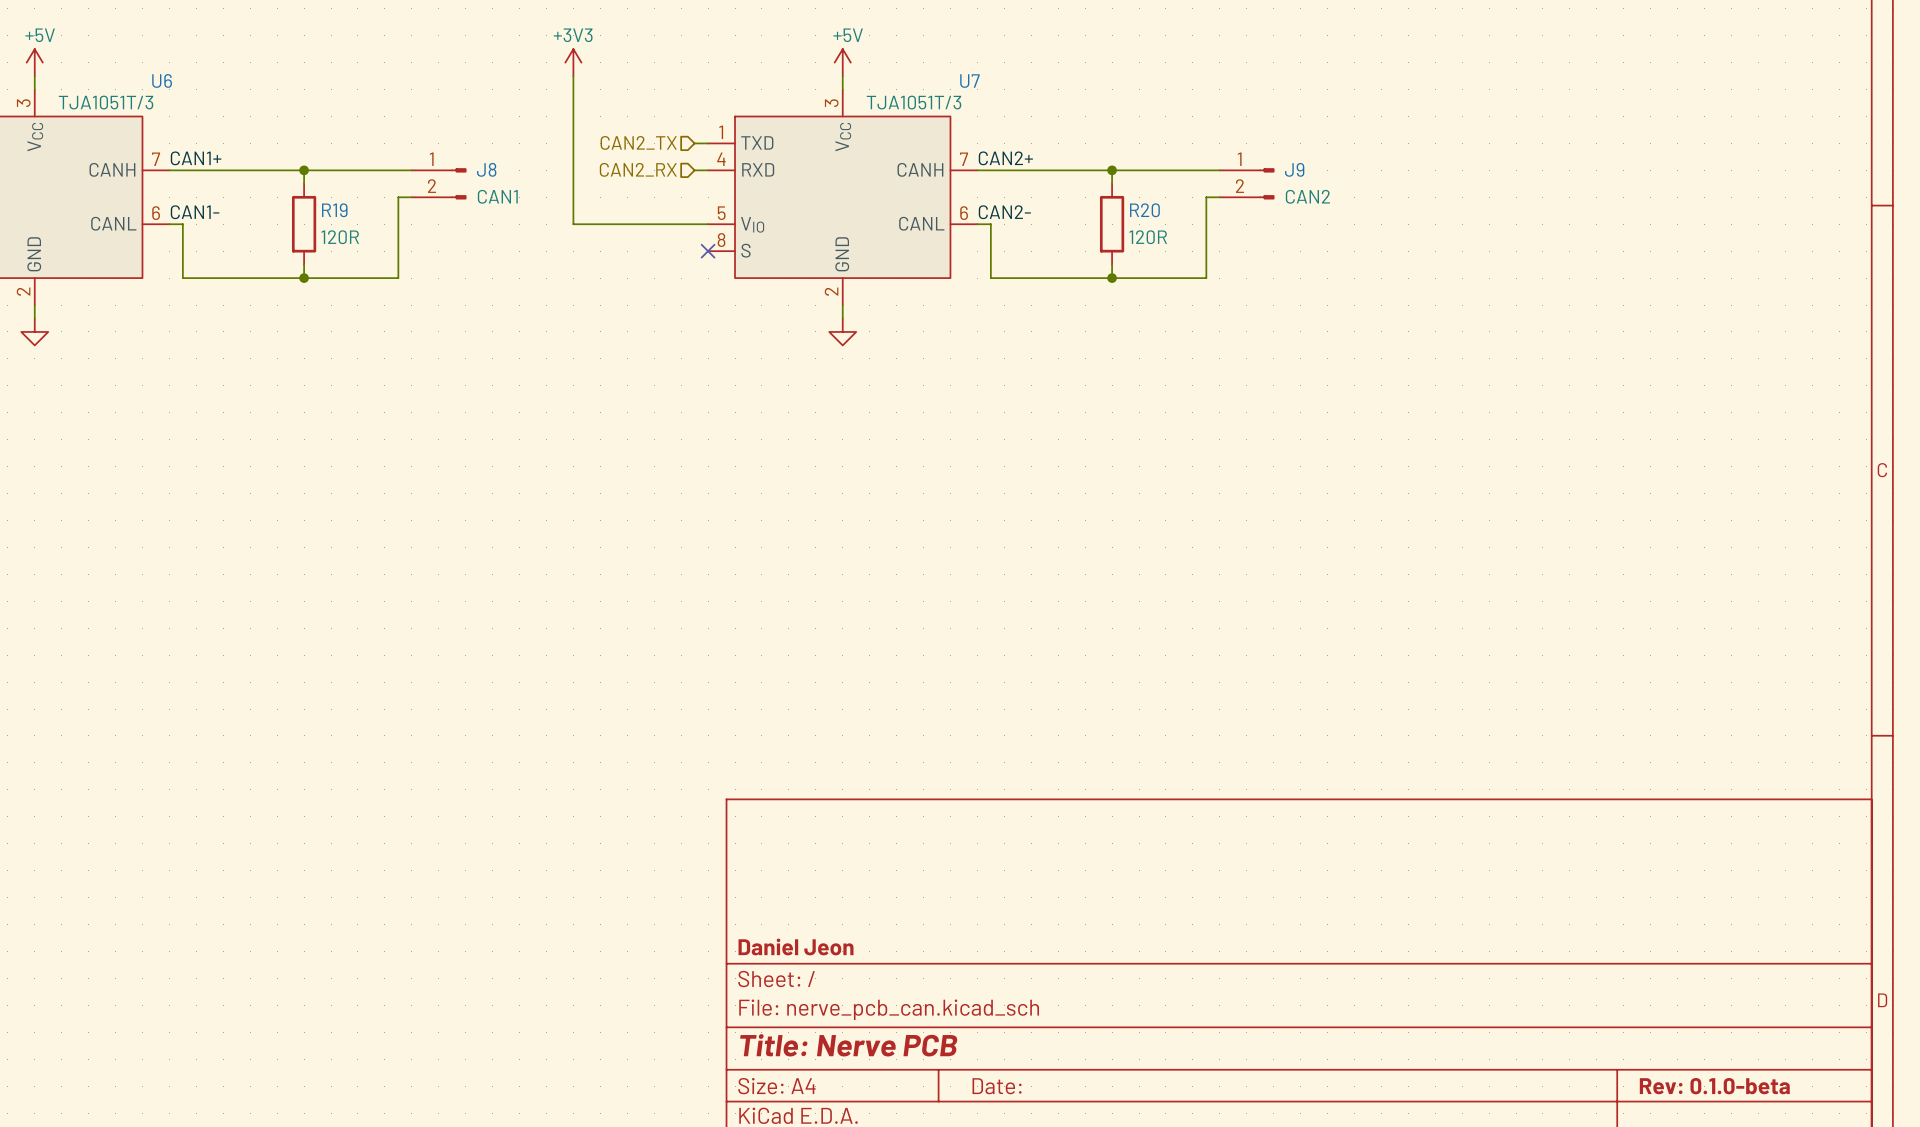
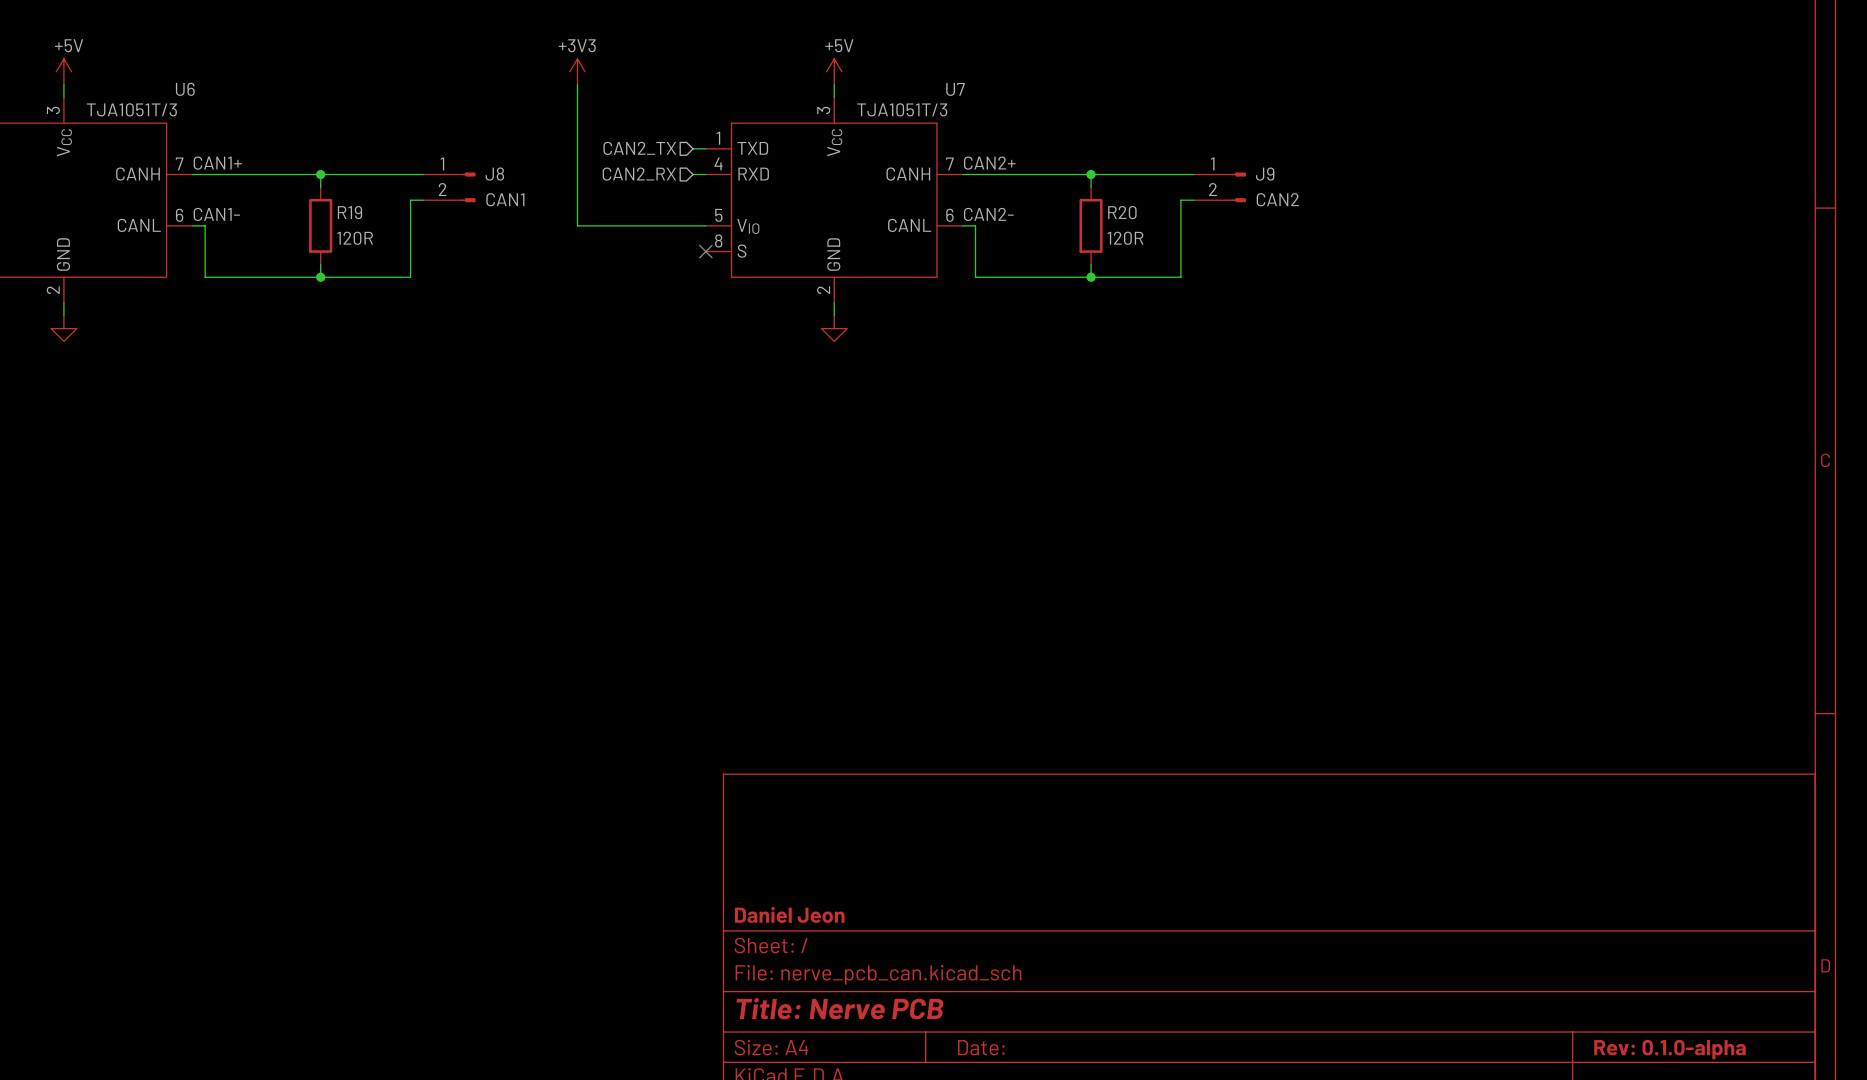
title block: Rev: 0.1.0-beta (1714, 1086) -> Rev: 0.1.0-alpha (1669, 1049)

